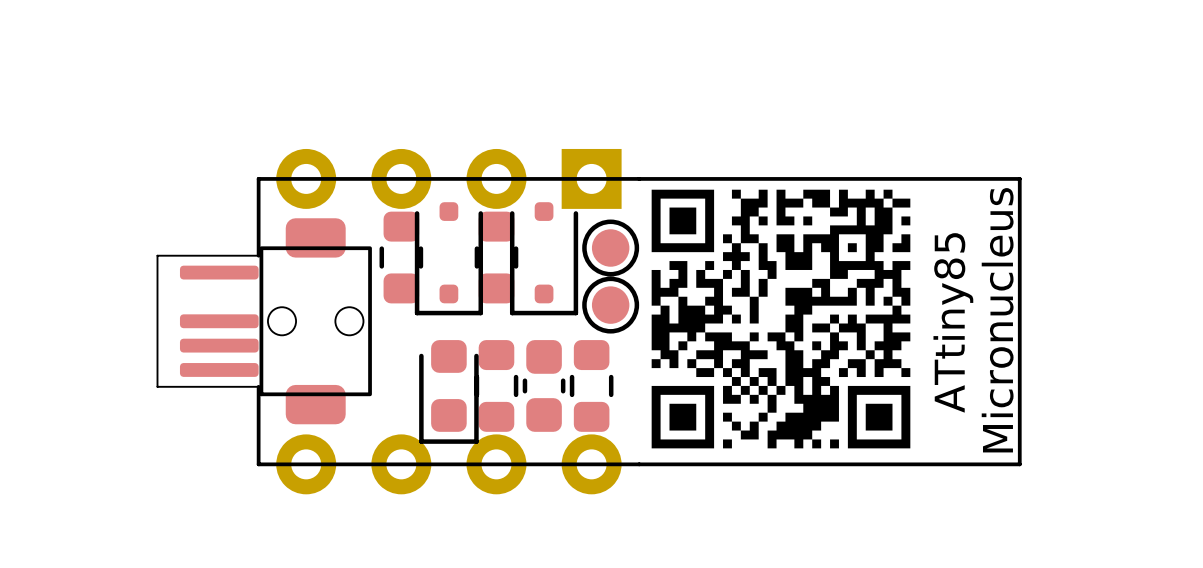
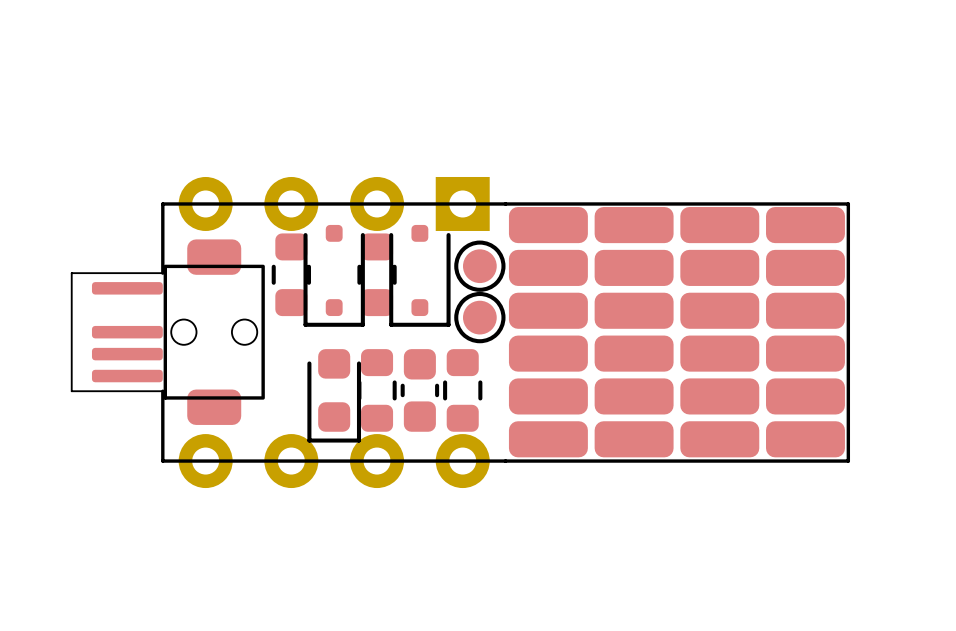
drawing: [651, 189, 911, 449] -> none
text: Micronucleus (997, 320) -> none
part: none -> (676, 332)
text: ATtiny85 (953, 322) -> none

